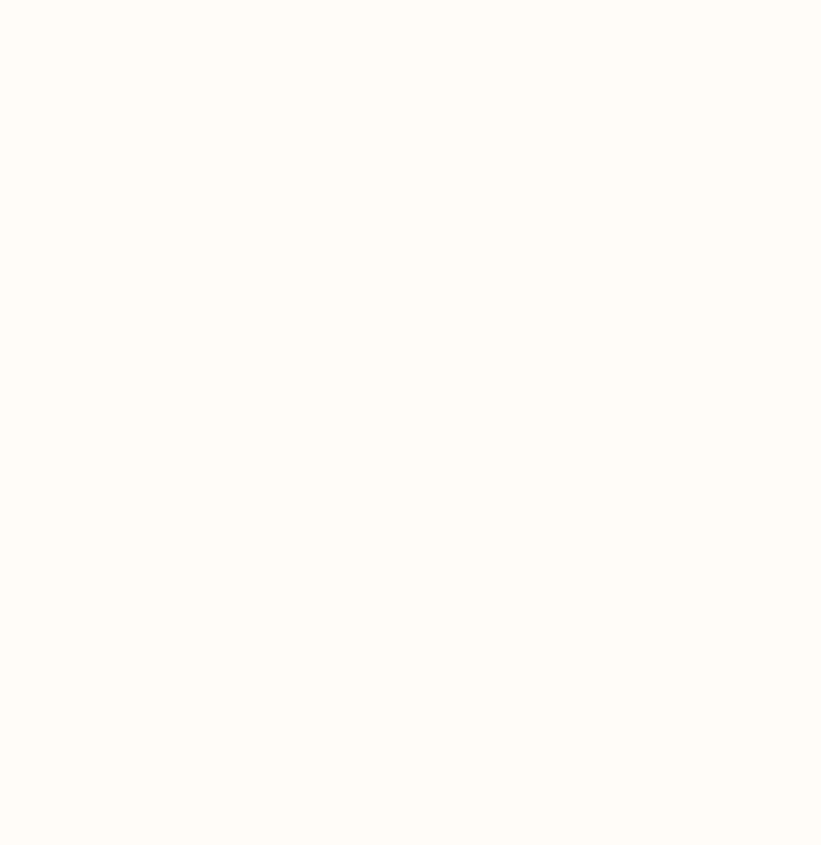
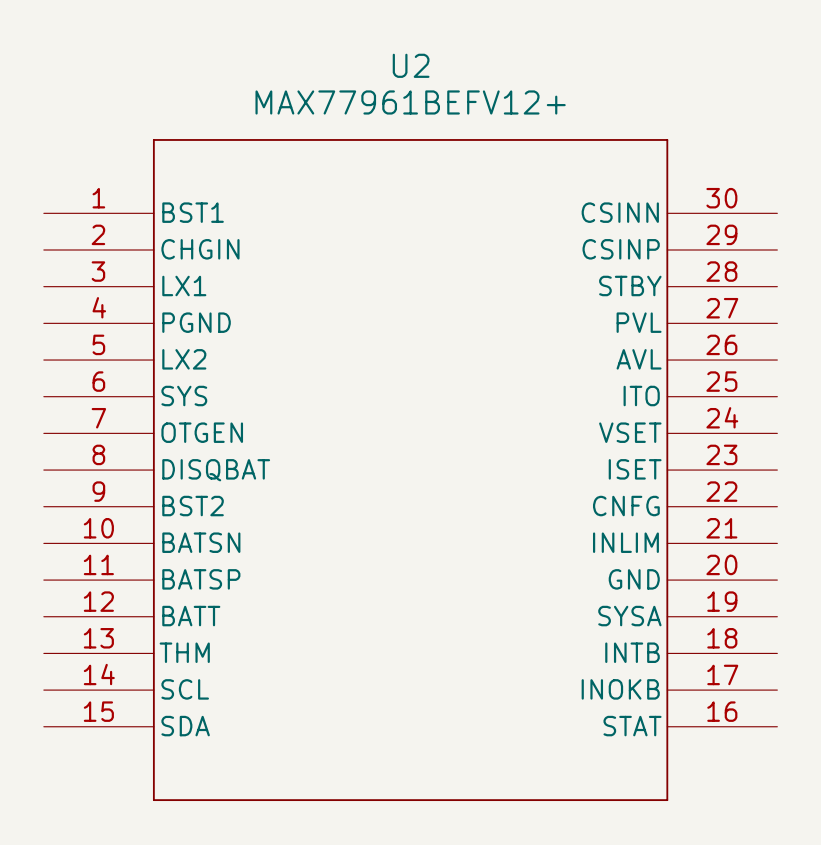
U2: none -> MAX77961BEFV12+ (410, 470)

